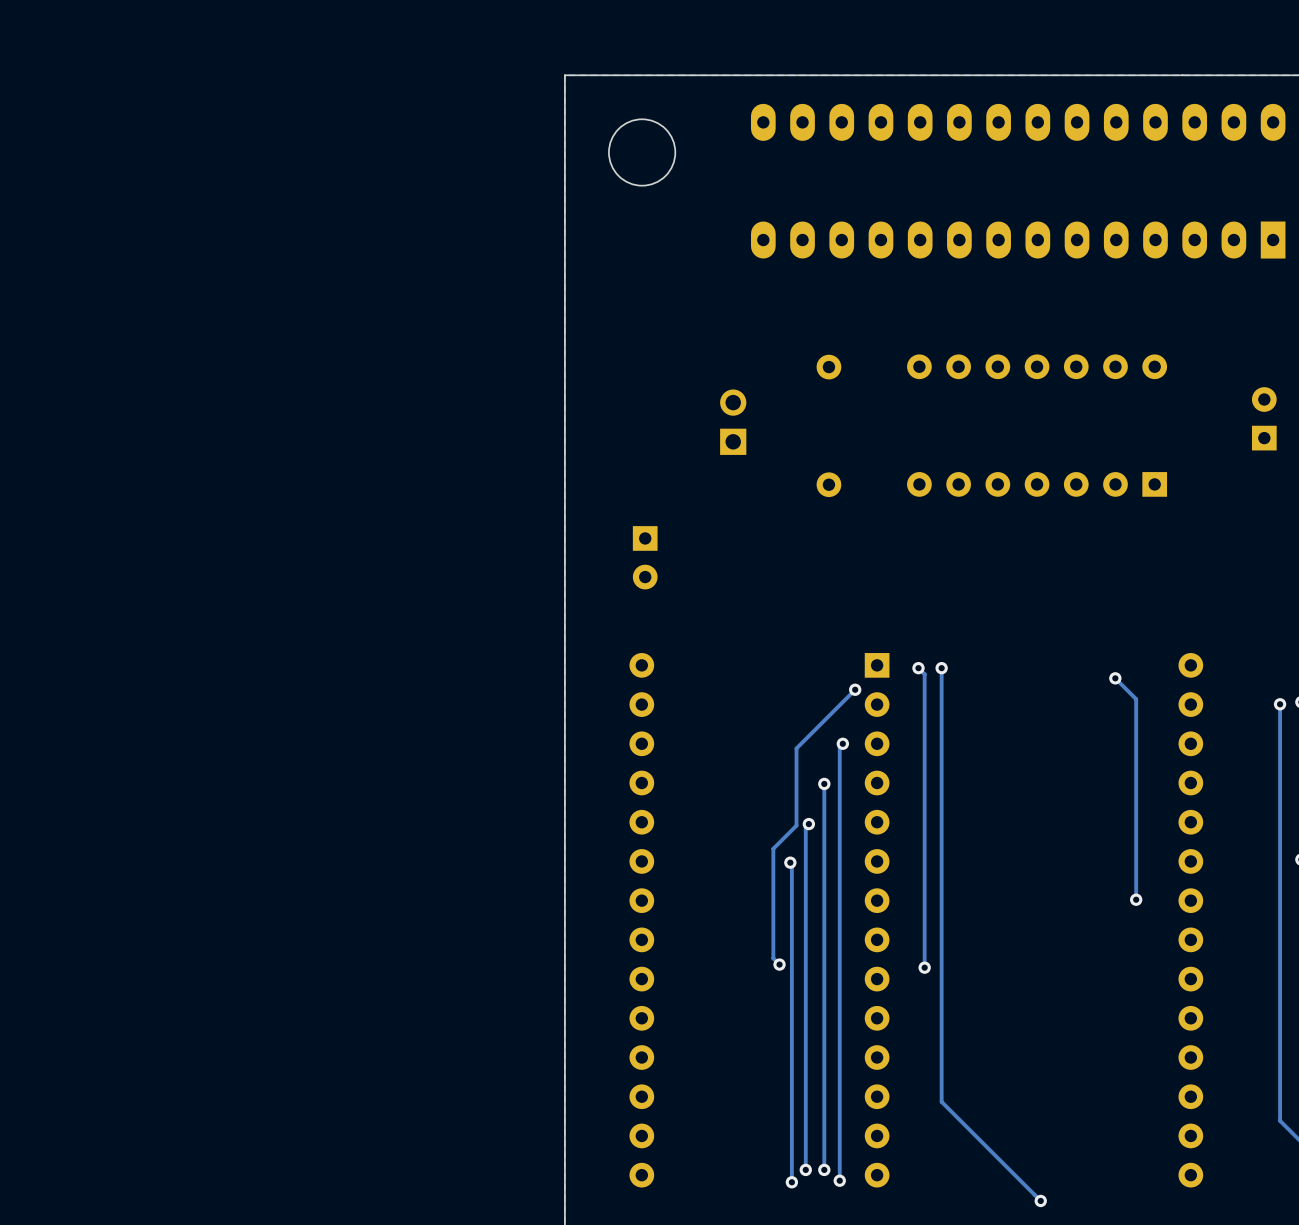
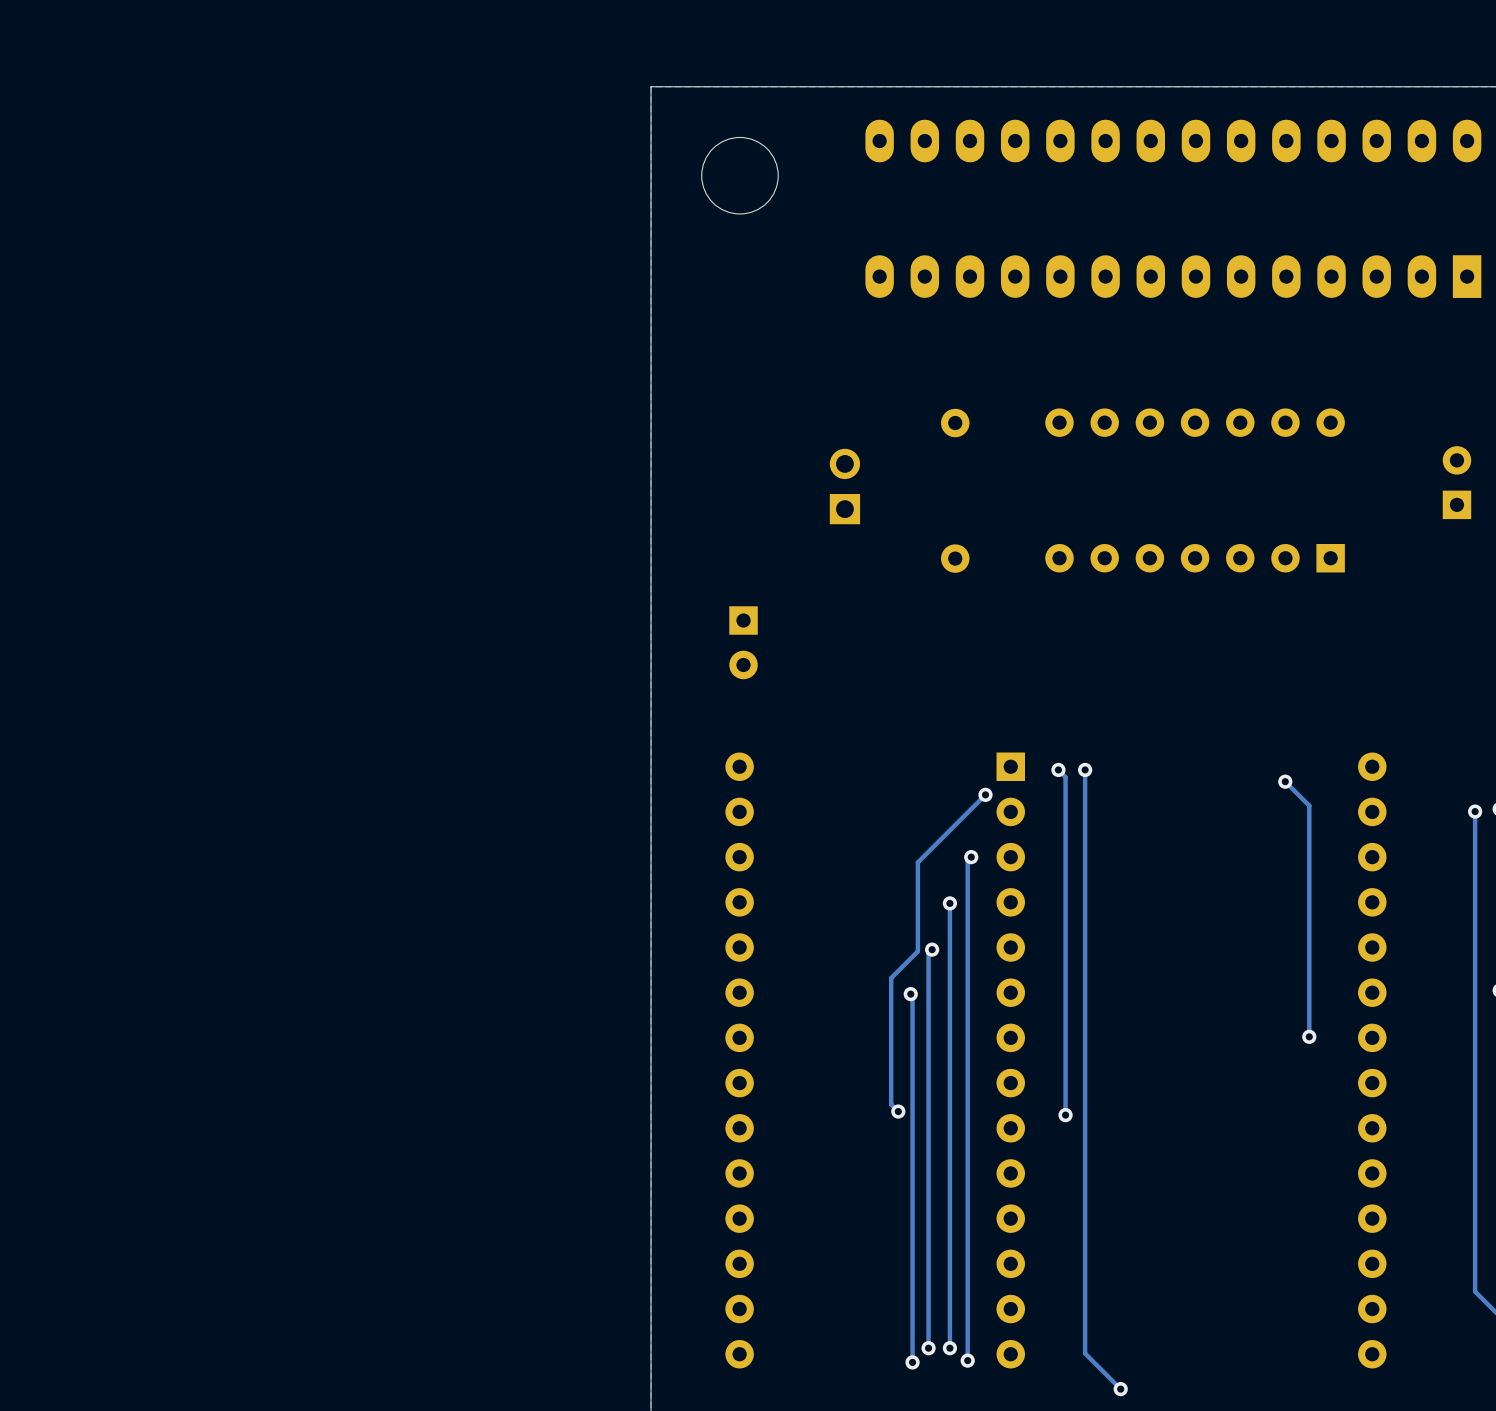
track: (941, 1101) (1040, 1200) -> (1085, 1269) (1085, 1353) (1120, 1389)
via position: (1040, 1200) -> (1120, 1389)

